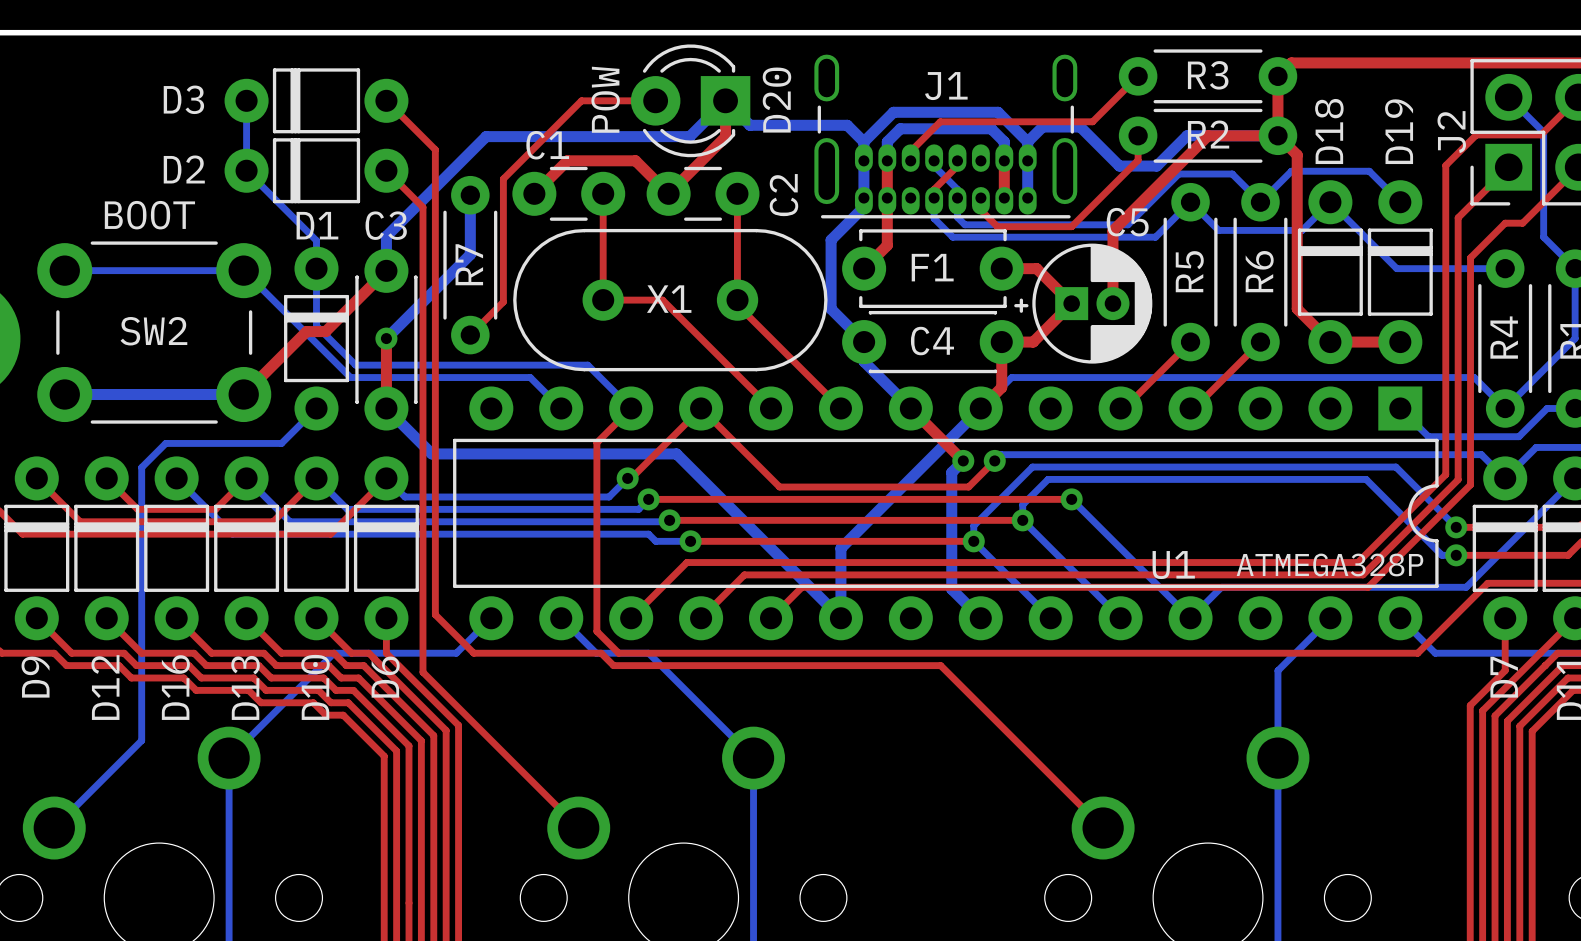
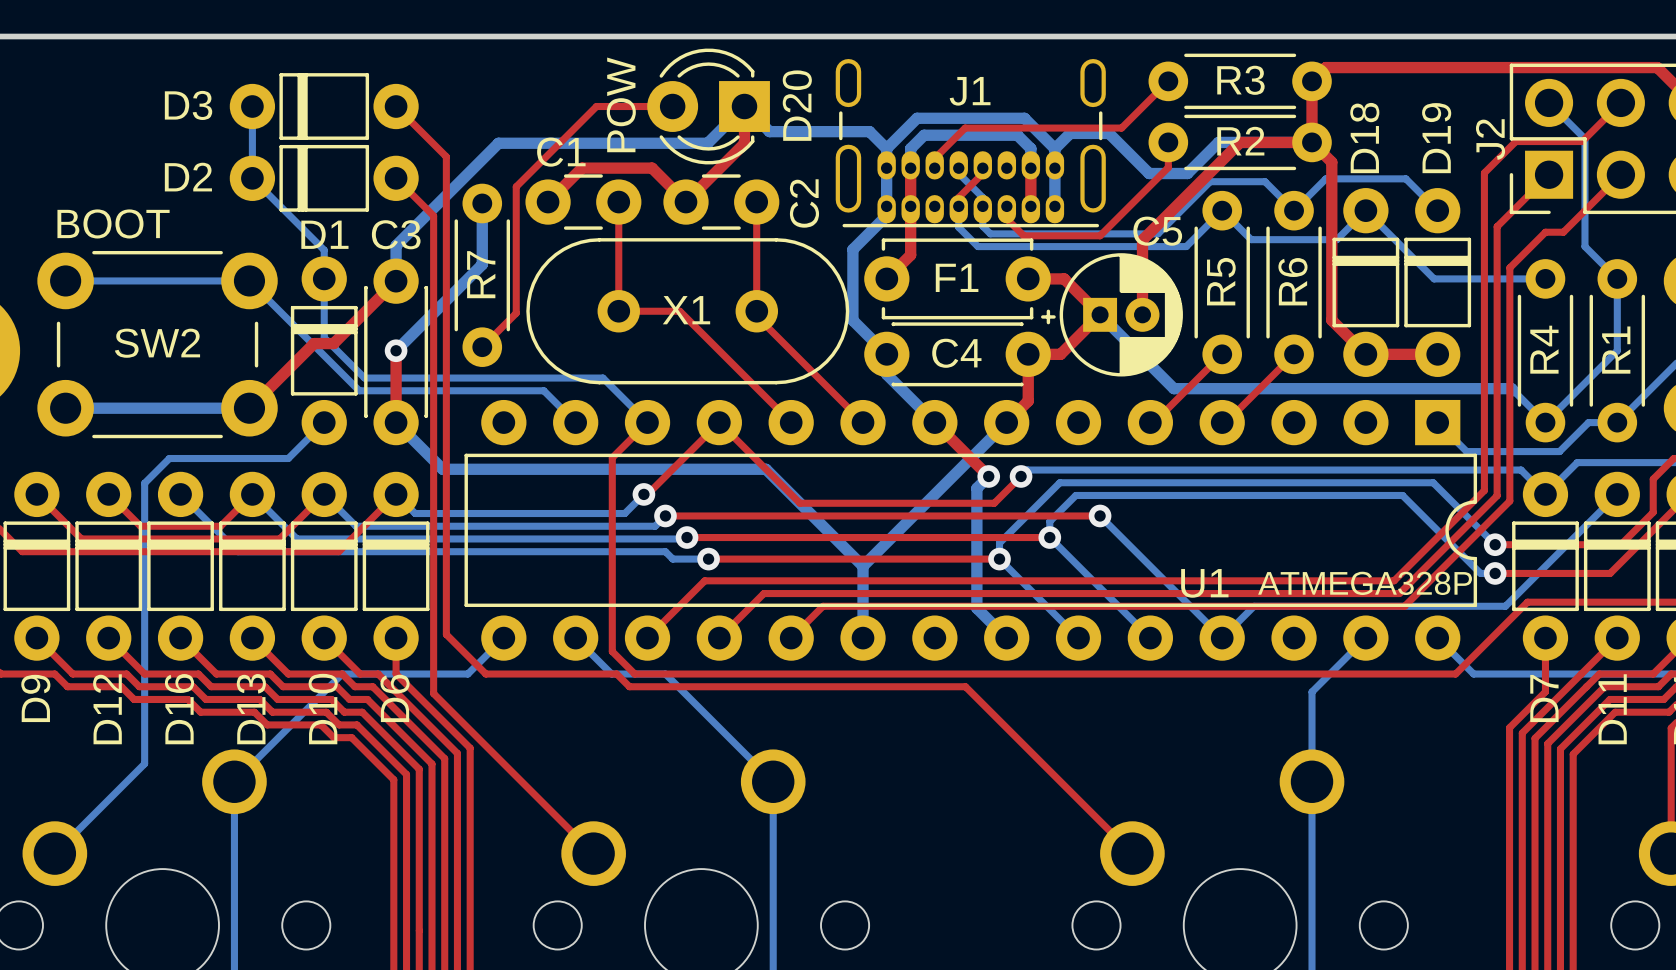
text position: BOOT (149, 215) -> BOOT (113, 223)
bottom track: (1474, 377) (1011, 377) (980, 408) -> (1513, 390) (1511, 388) (1173, 388) (1100, 314)
bottom track: (676, 453) (840, 618) -> (694, 469) (766, 469) (863, 566)

